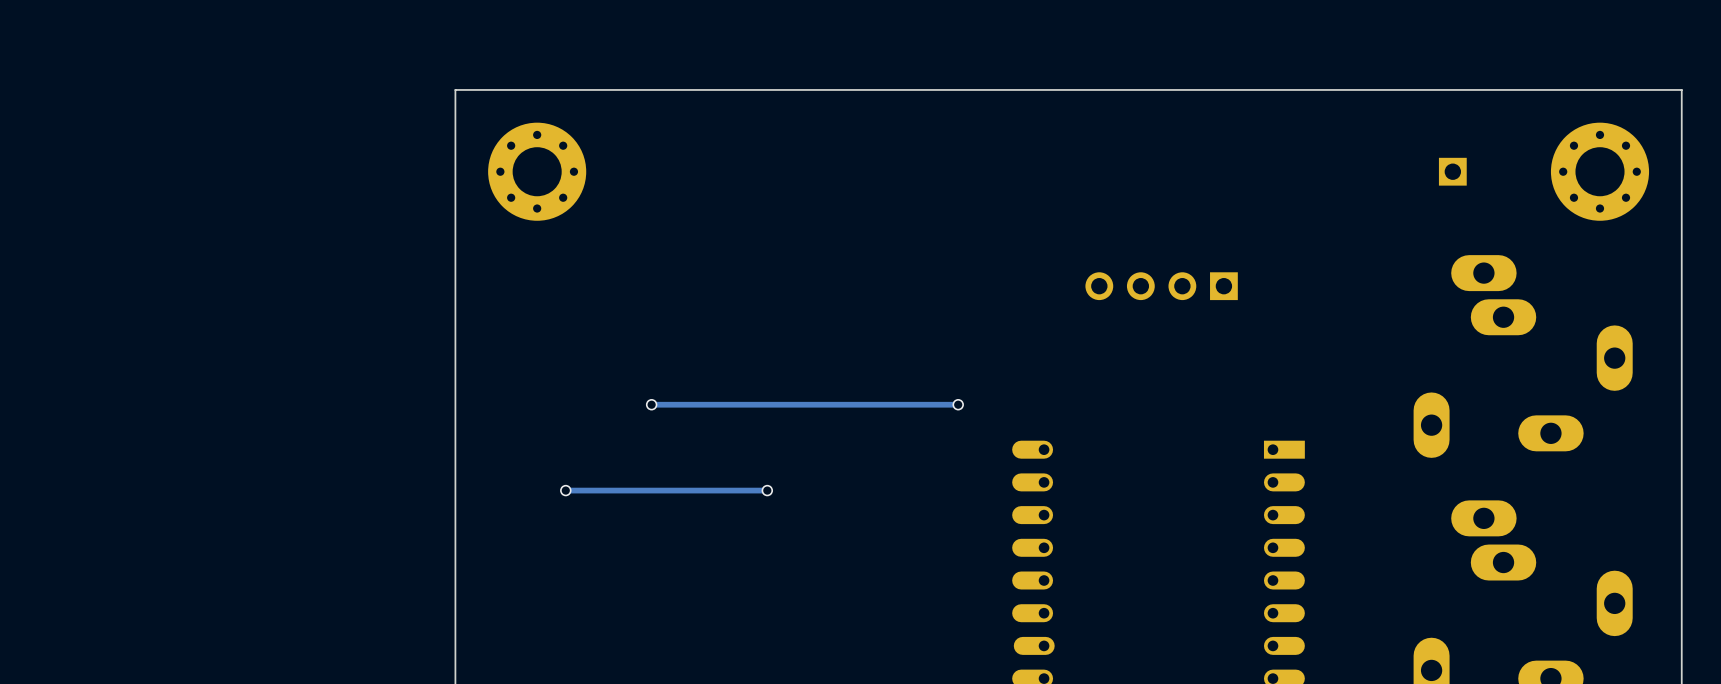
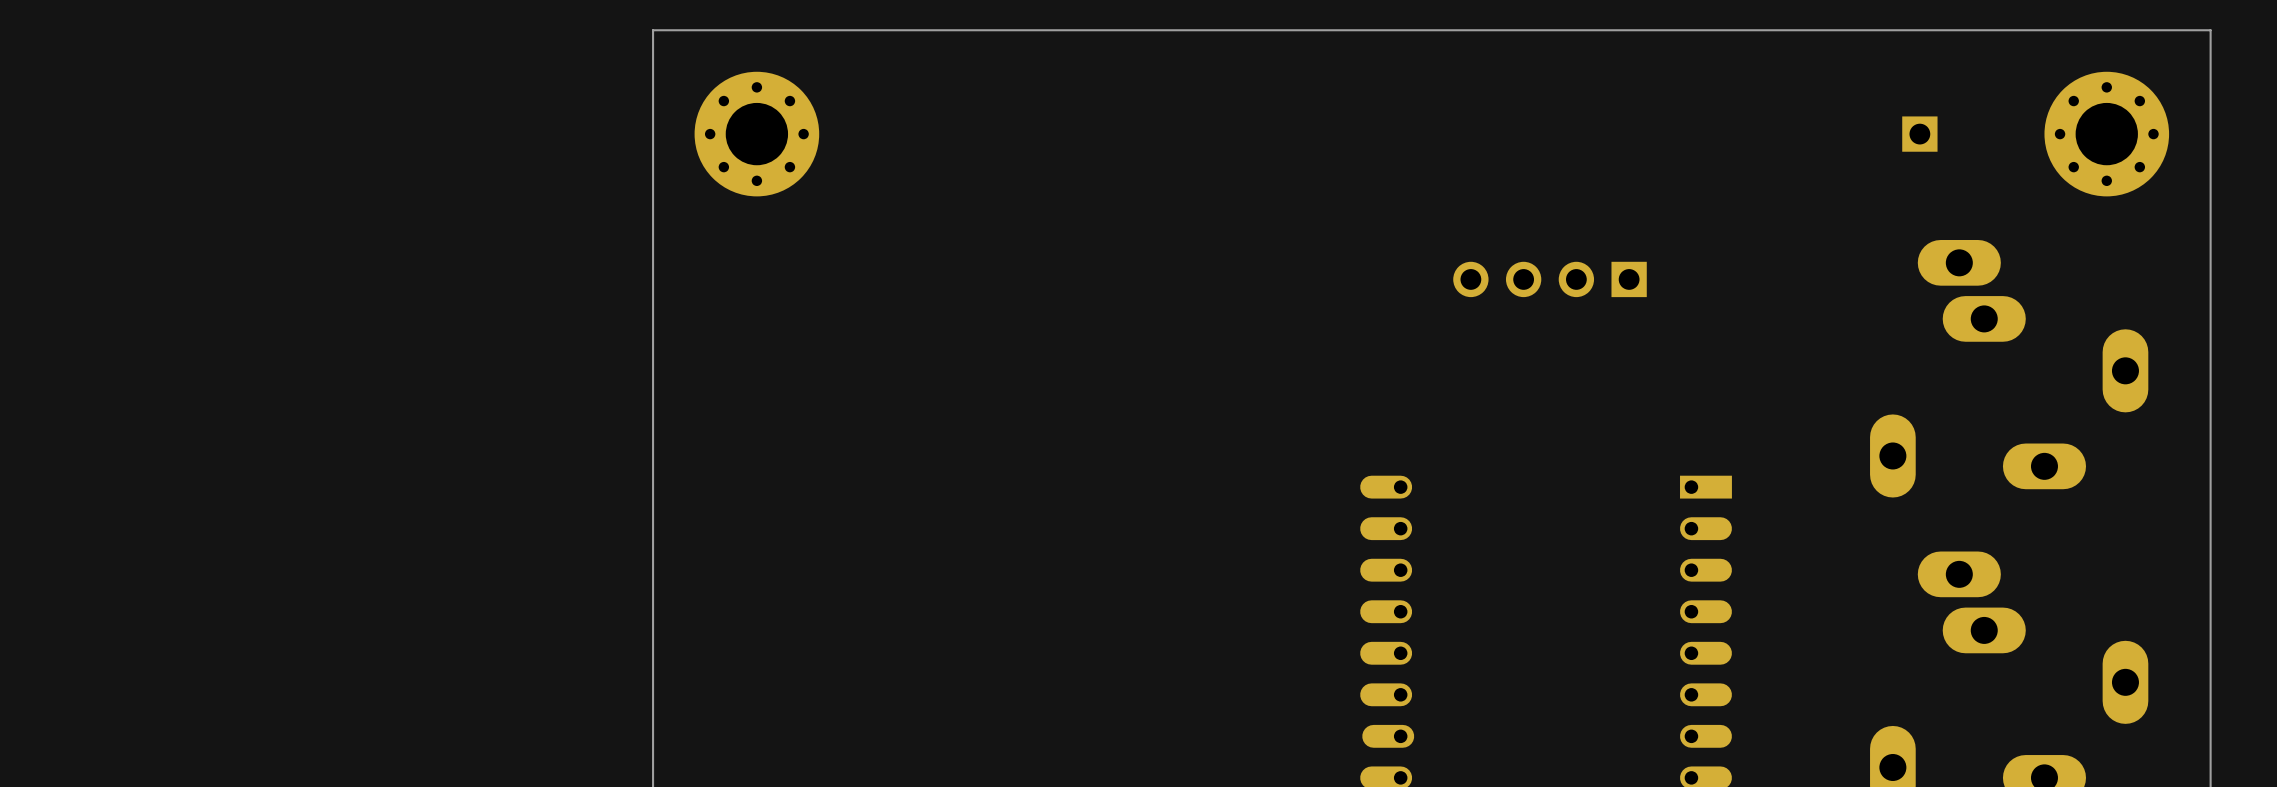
via: (651, 404) -> none
track: (958, 404) (651, 404) -> none
via: (958, 404) -> none
via: (565, 490) -> none
track: (767, 490) (565, 490) -> none
via: (767, 490) -> none

